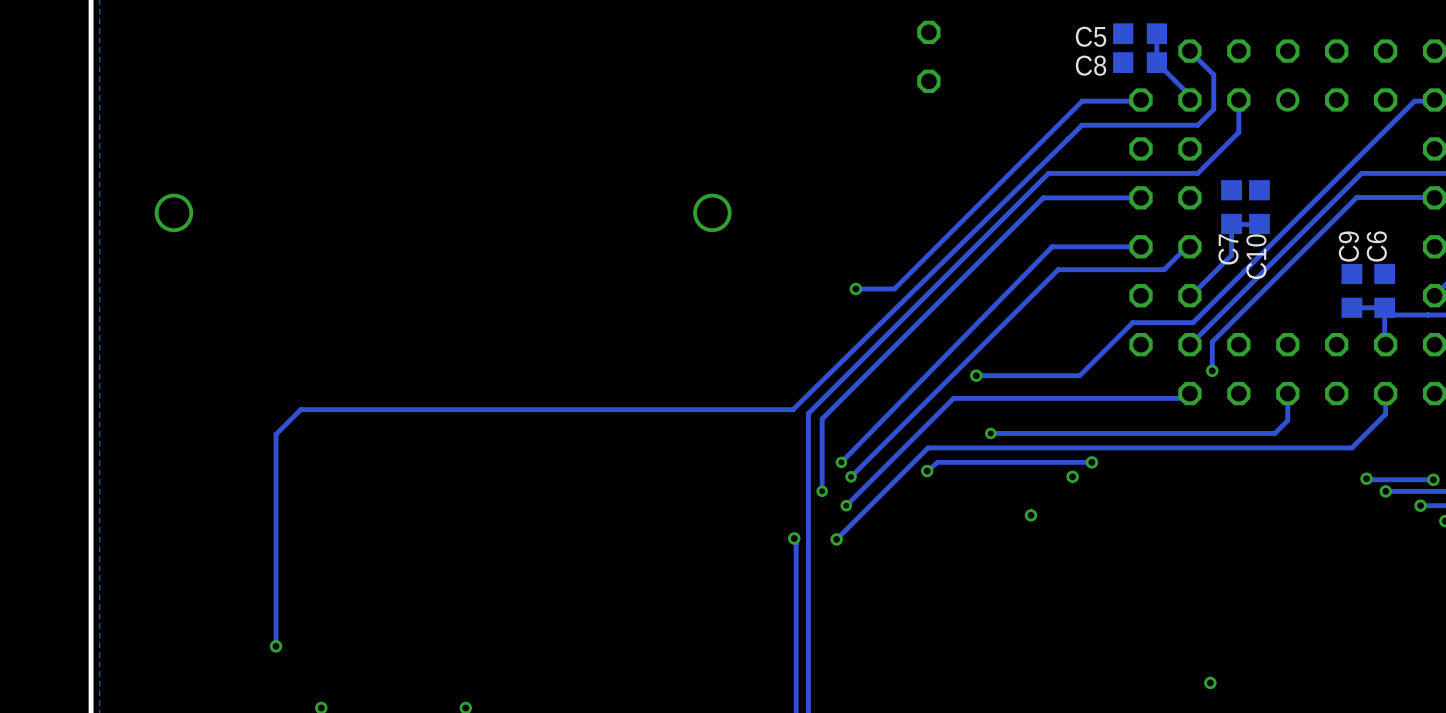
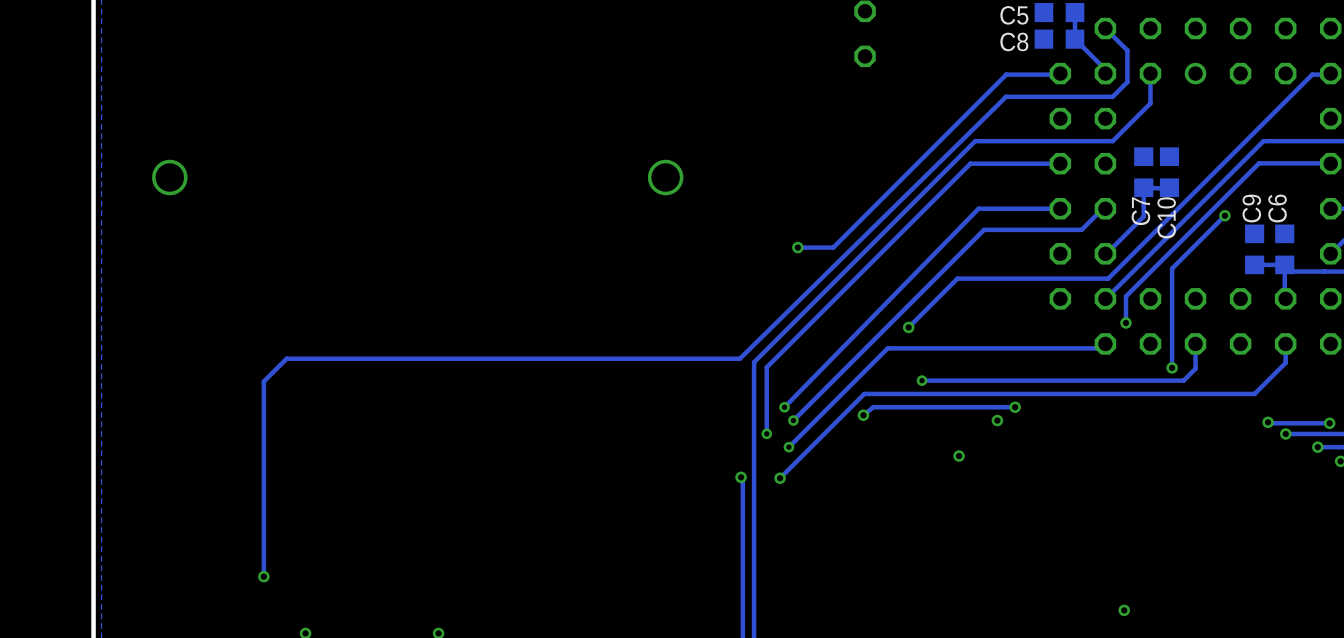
track: none -> (1224, 215) (1172, 268) (1172, 367)
via: none -> (1224, 215)
track: (1132, 322) (1079, 375) (976, 375) -> (1052, 278) (957, 278) (908, 327)
via: none -> (1172, 367)

